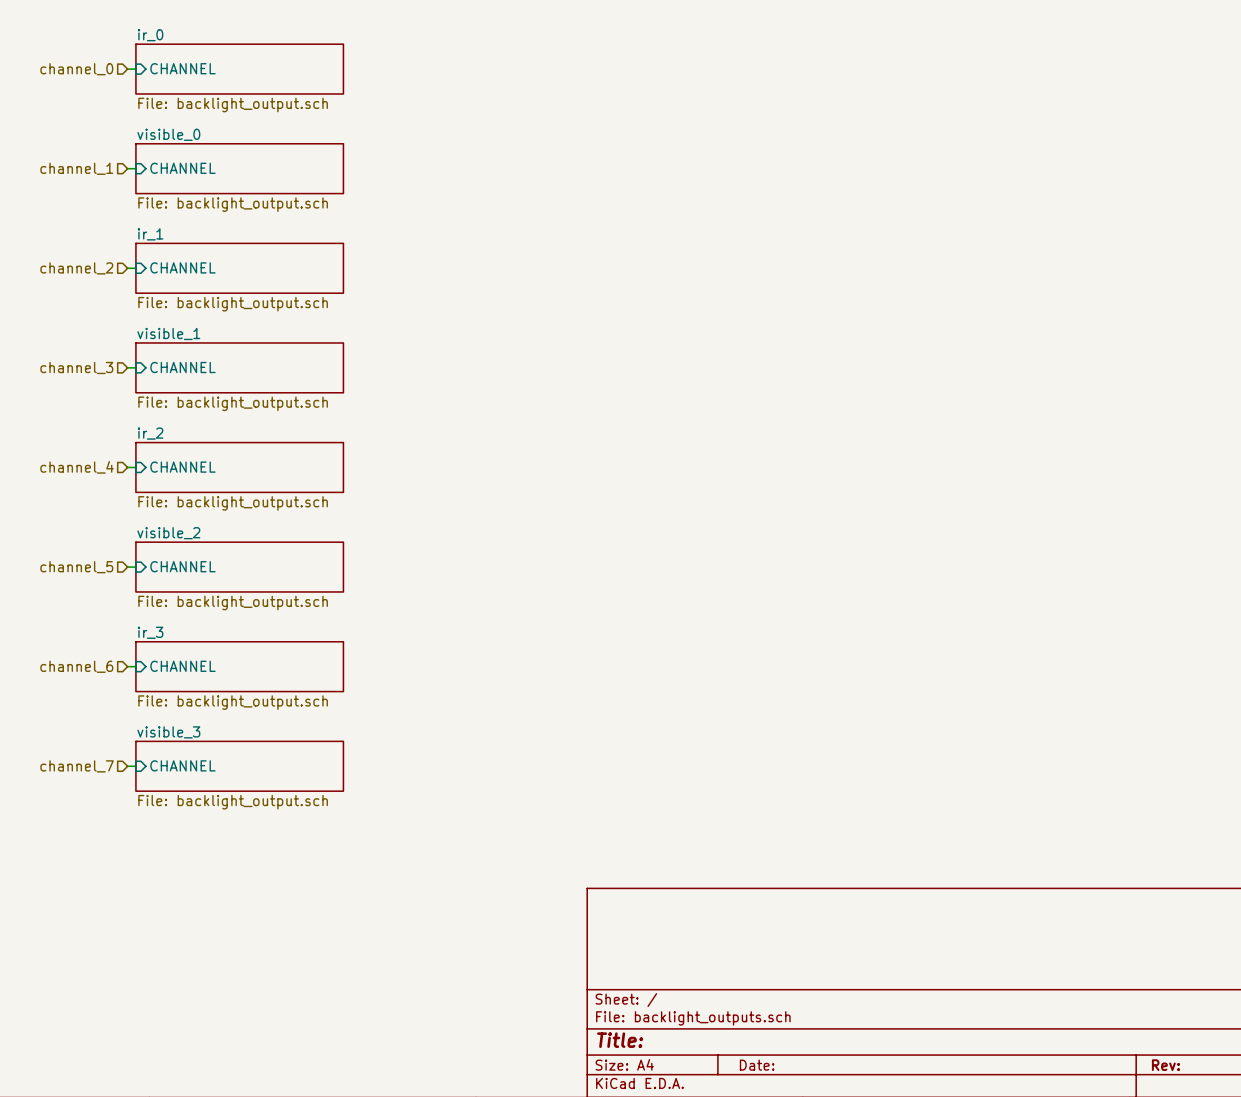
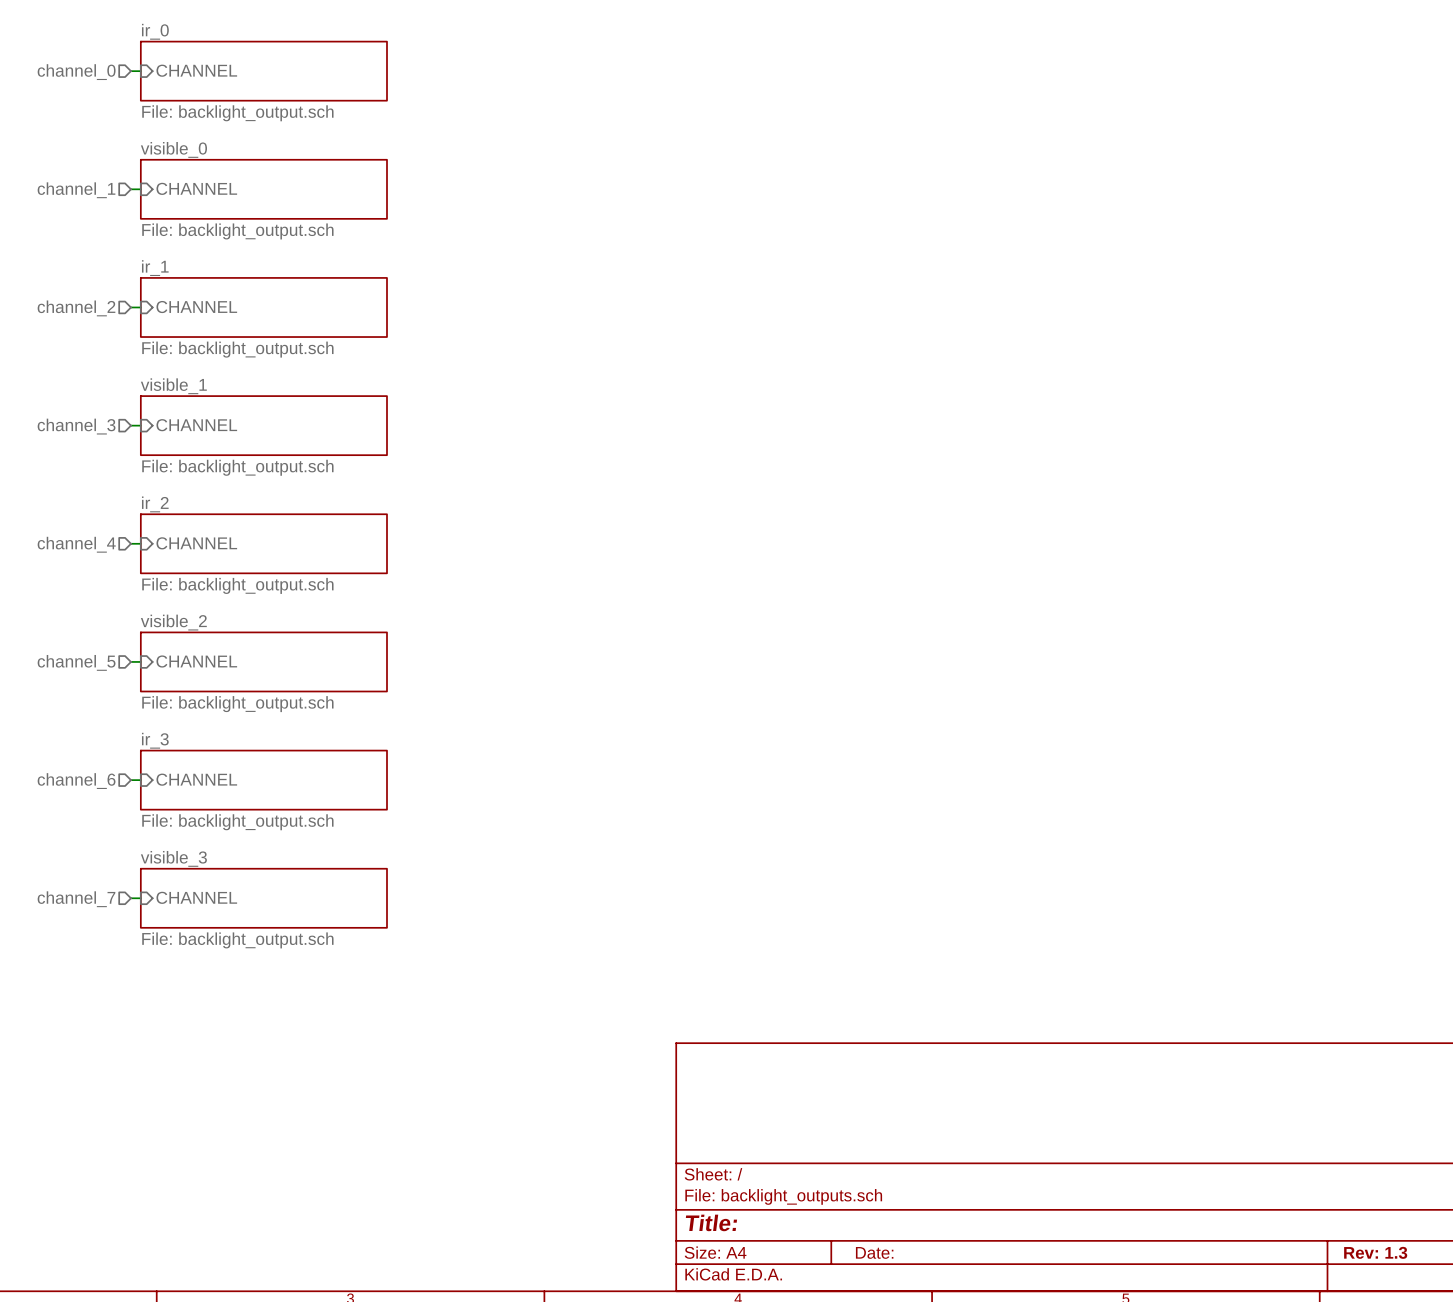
title block: Rev: (1165, 1065) -> Rev: 1.3 (1375, 1252)

